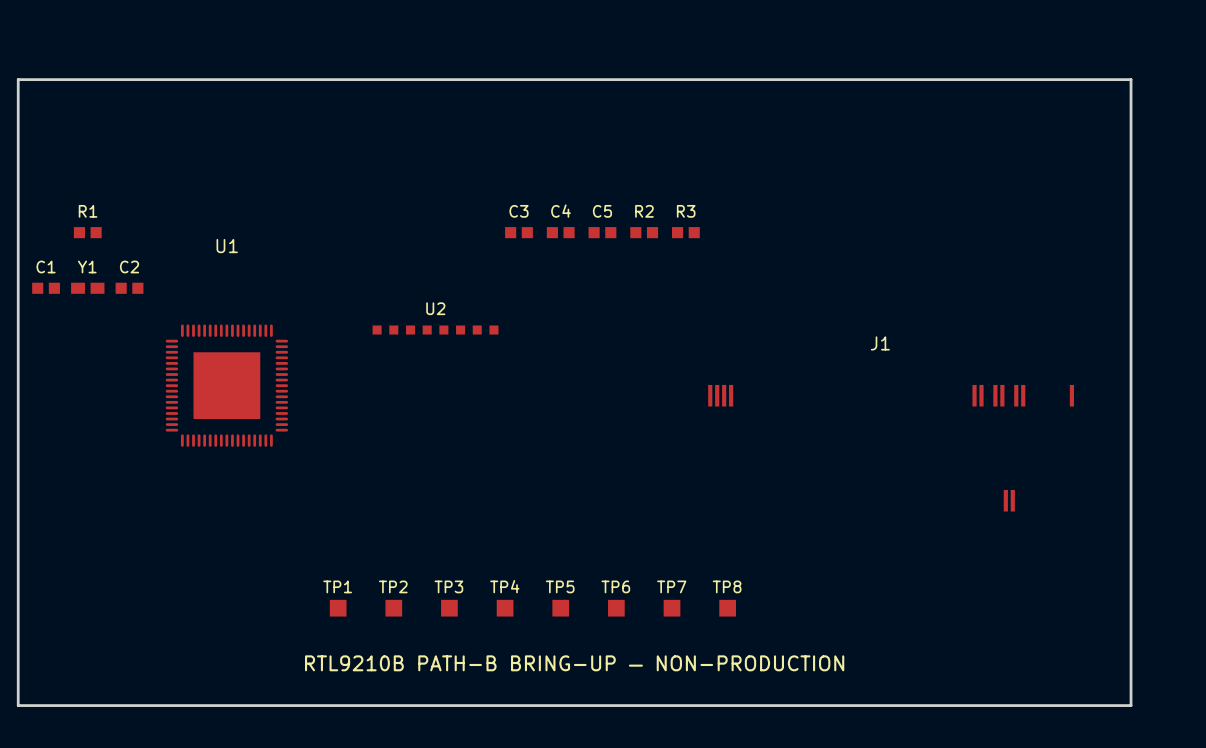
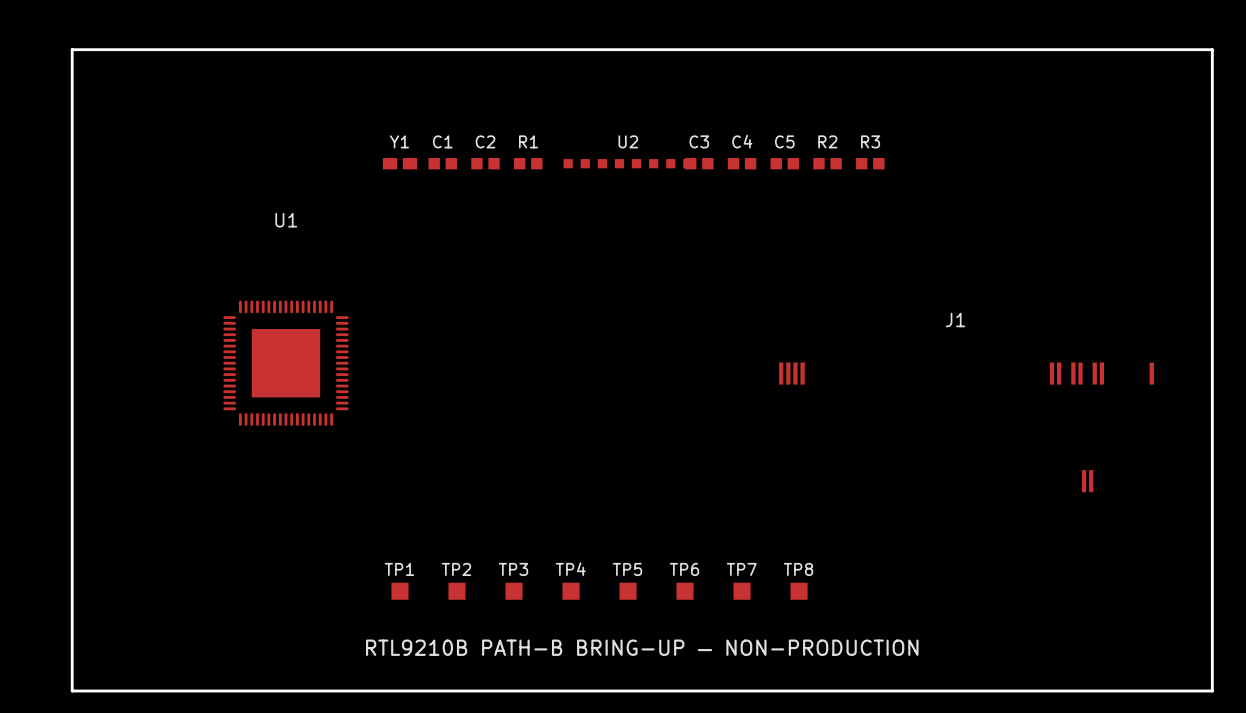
R1 position: (87, 232) -> (528, 163)
C3 position: (518, 232) -> (699, 163)
C4 position: (560, 232) -> (742, 163)
C5 position: (602, 232) -> (784, 163)
R2 position: (644, 232) -> (827, 163)
R3 position: (685, 232) -> (870, 163)
C1 position: (46, 288) -> (442, 163)
Y1 position: (87, 288) -> (399, 163)
C2 position: (129, 288) -> (485, 163)
U2 position: (435, 330) -> (628, 163)

